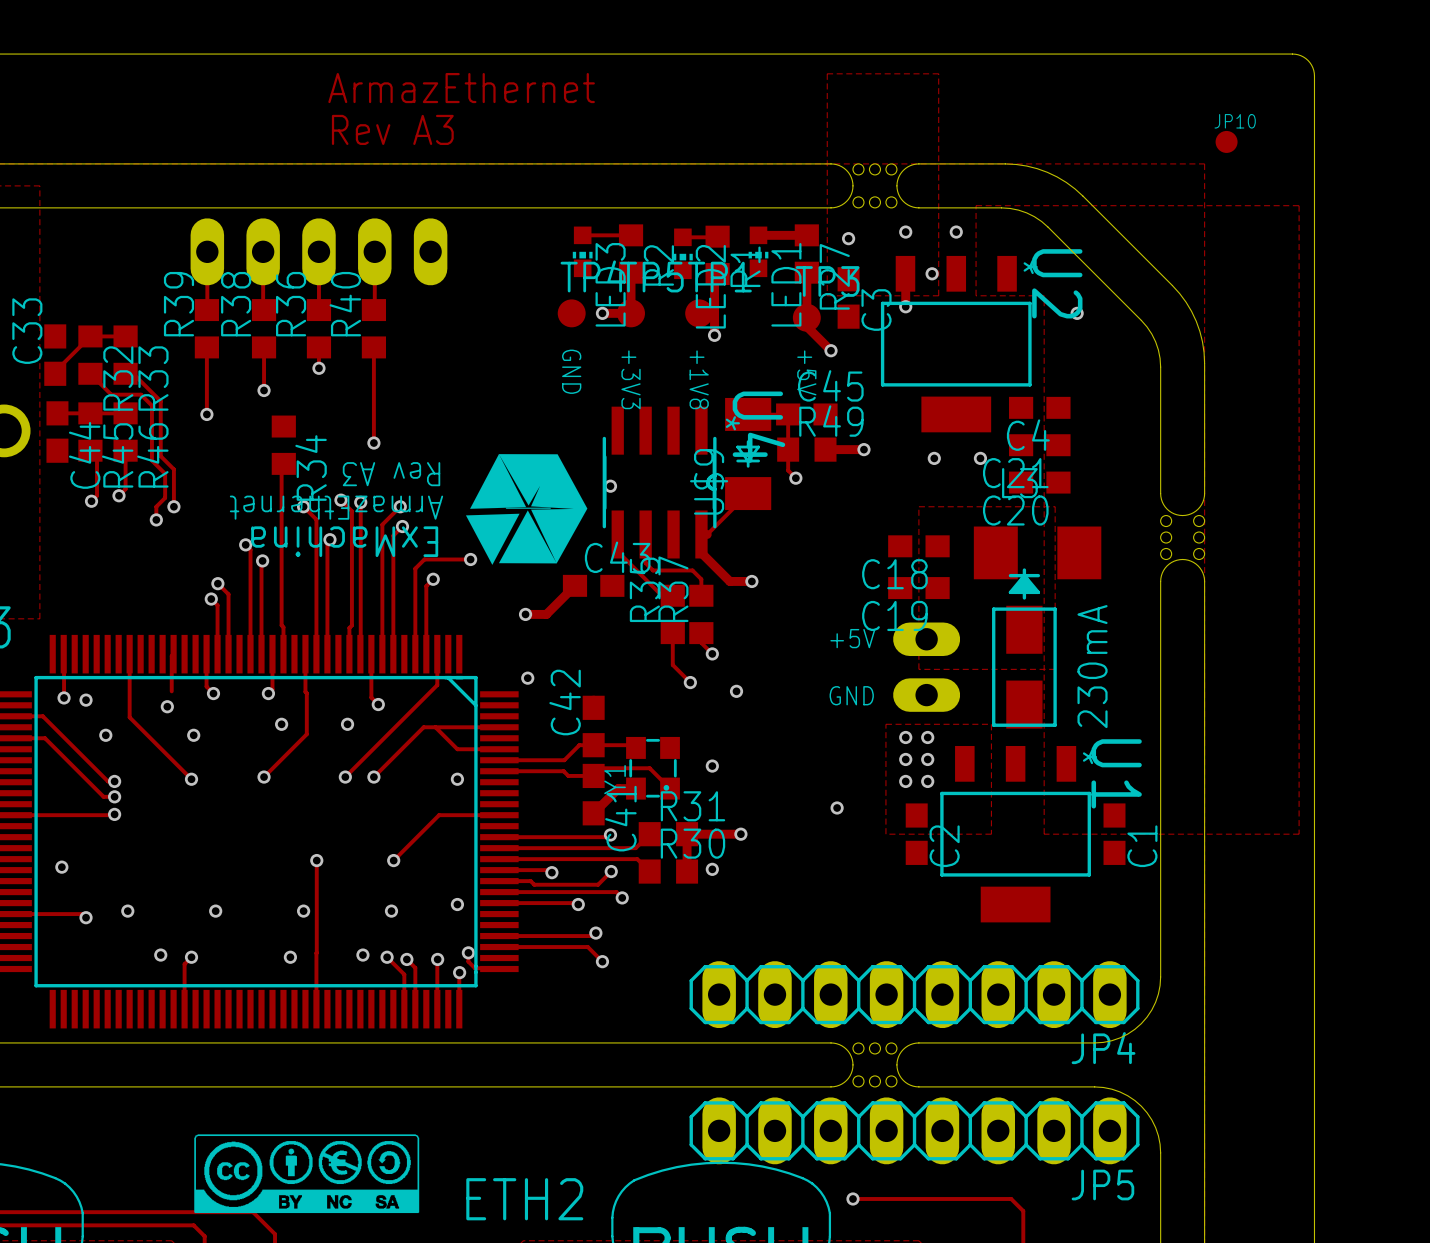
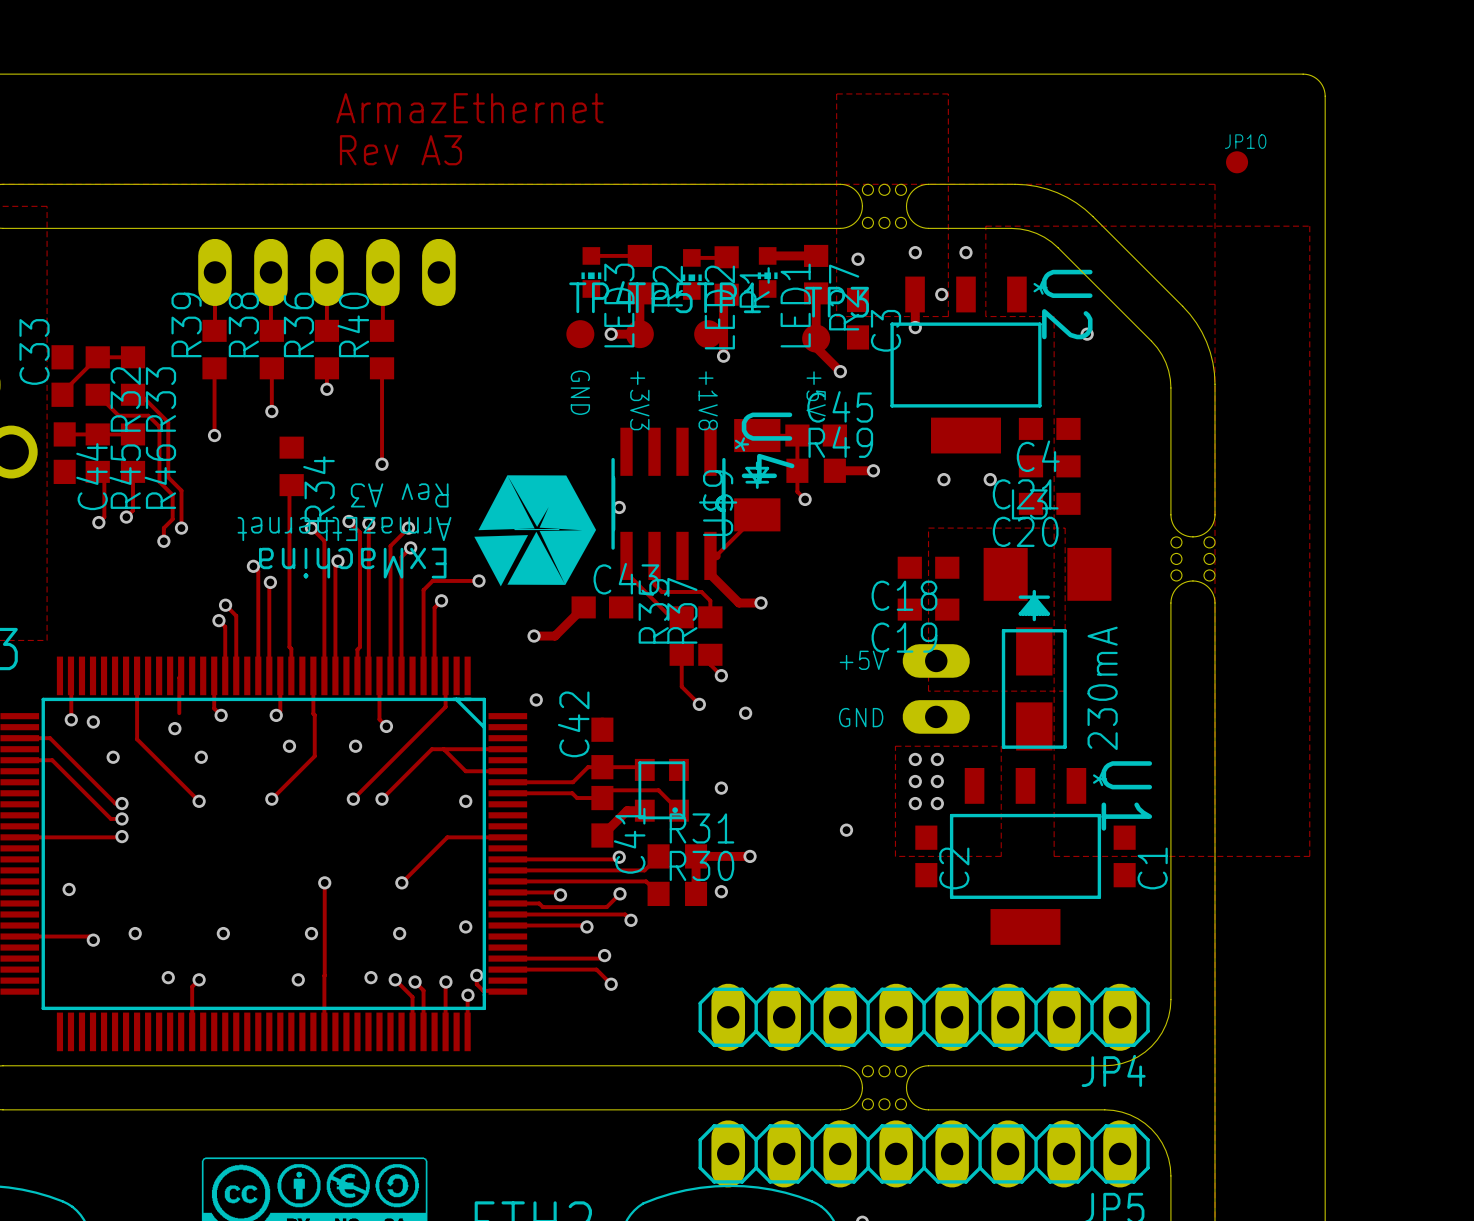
Y1: (653, 768) -> none
part: none -> (661, 790)

